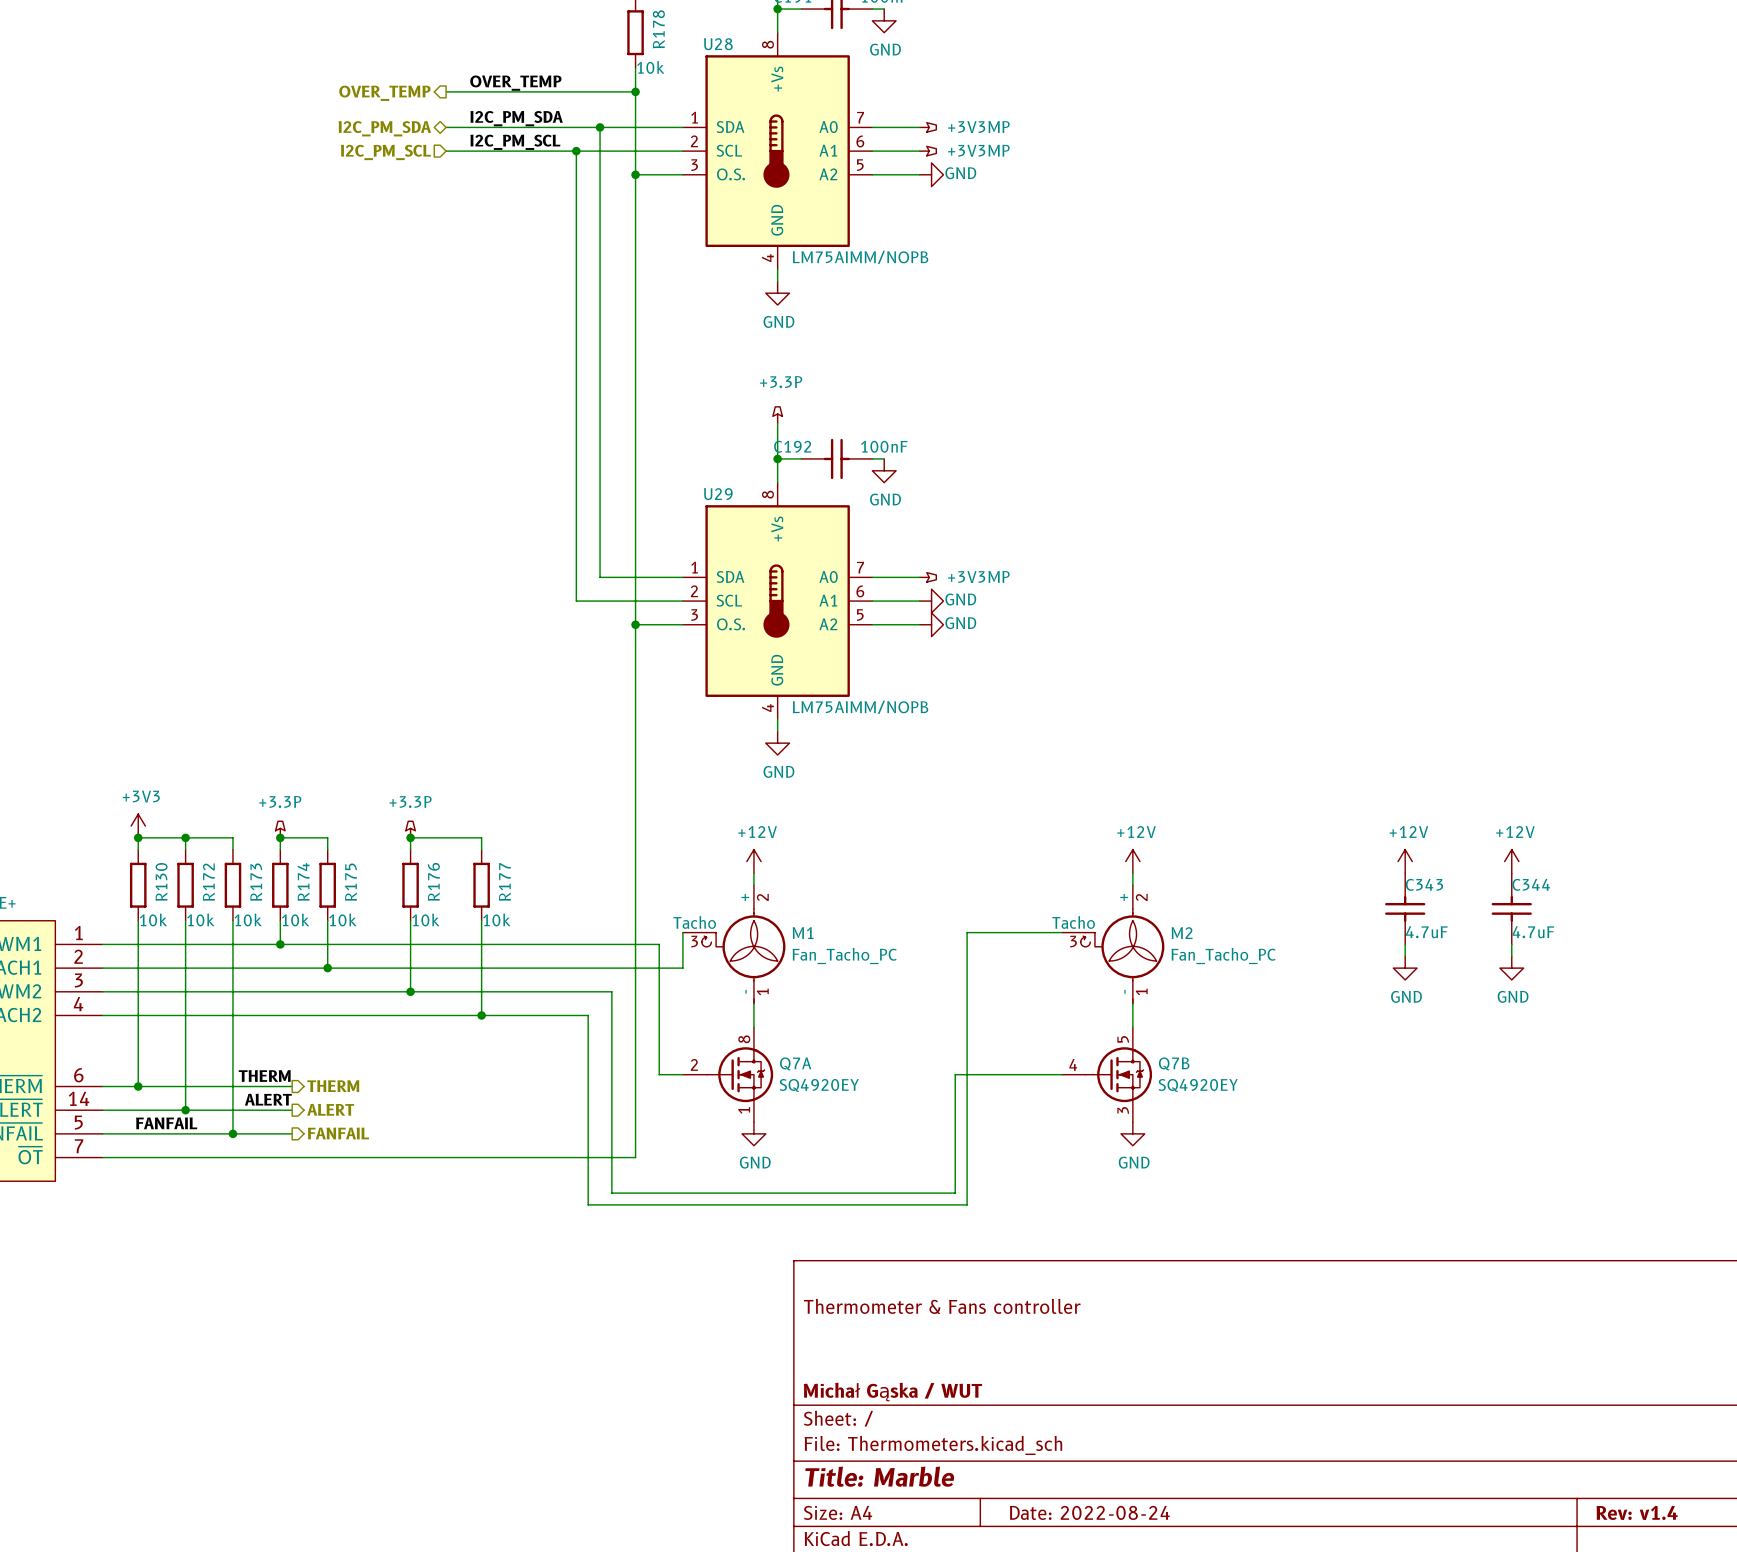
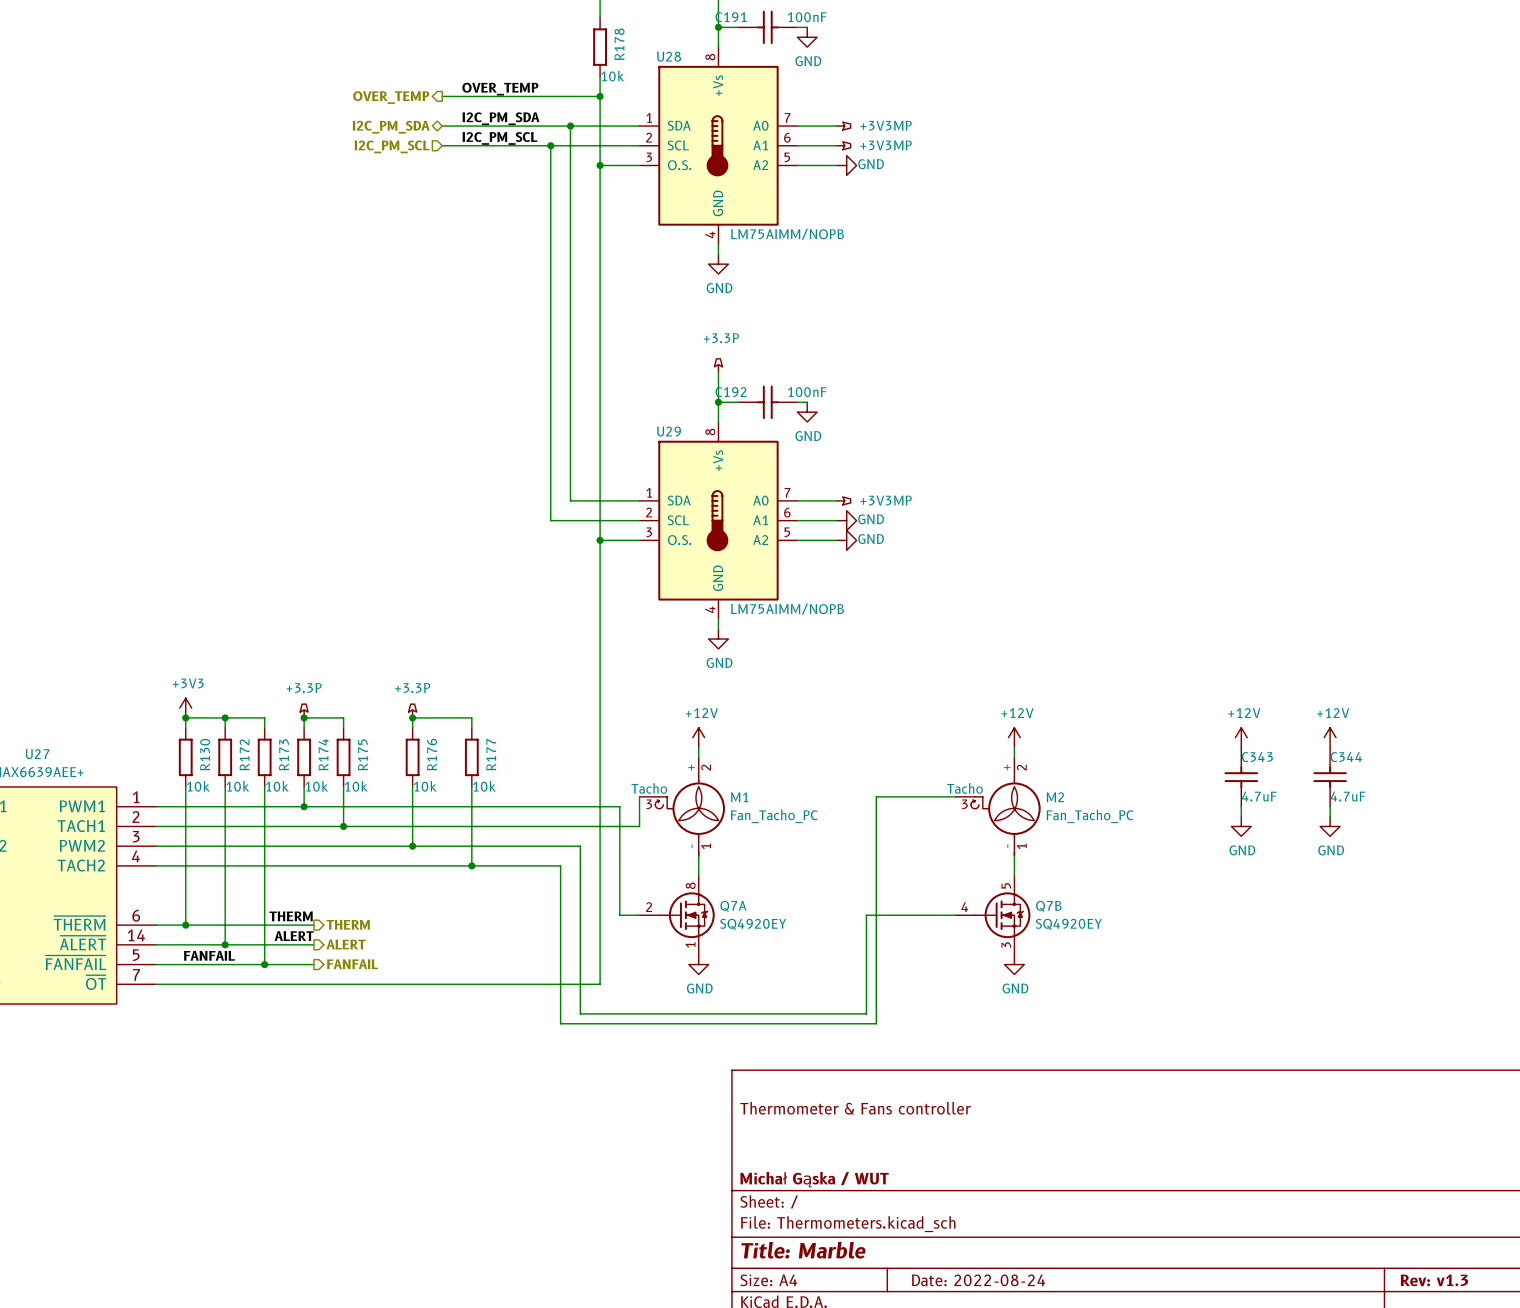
title block: Rev: v1.4 (1637, 1512) -> Rev: v1.3 (1434, 1280)

